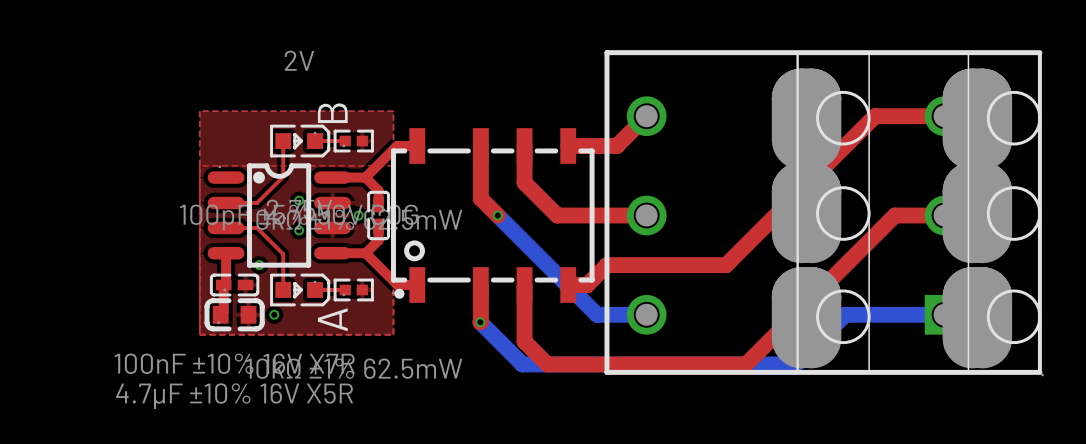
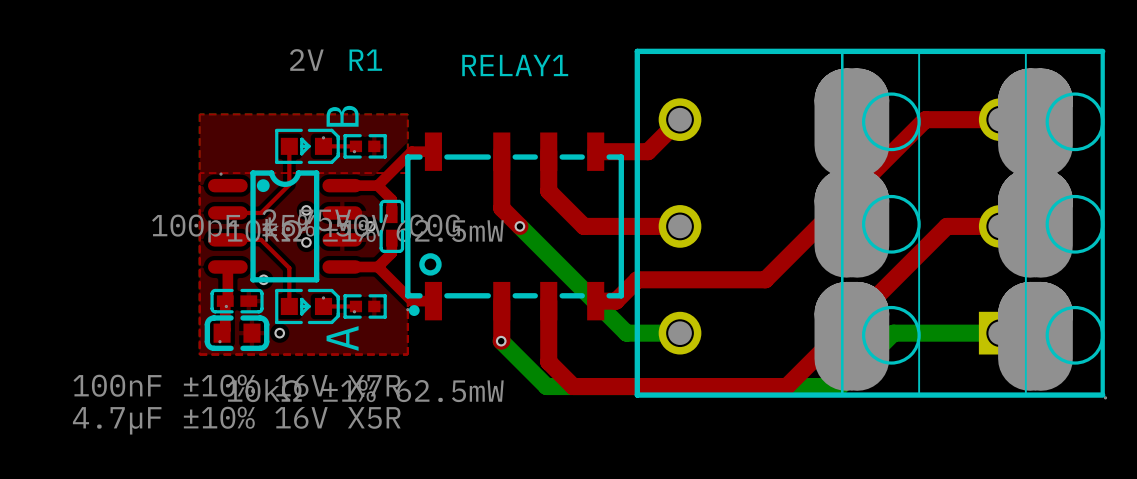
R1 name: none -> R1 (365, 60)
RELAY1 name: none -> RELAY1 (515, 65)

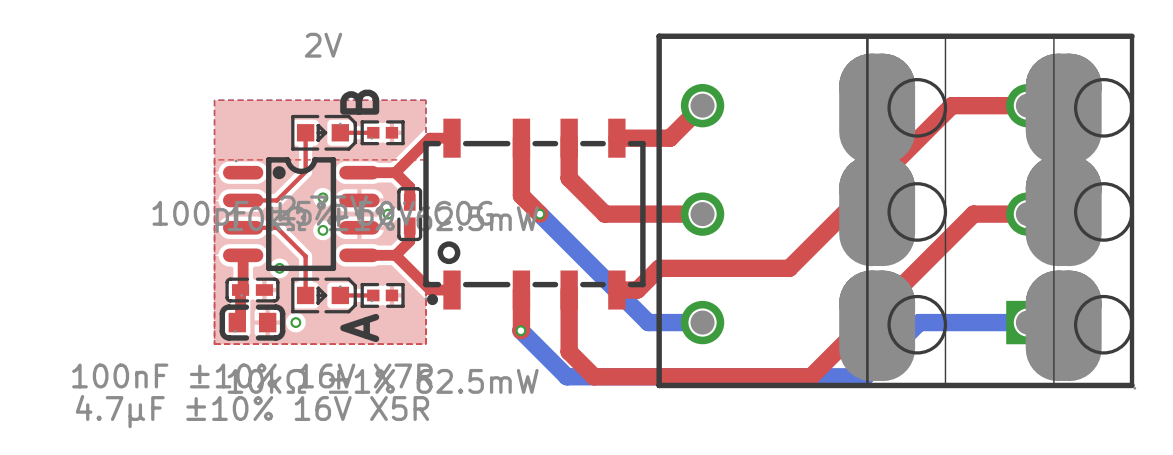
R1 name: R1 (365, 60) -> none
RELAY1 name: RELAY1 (515, 65) -> none

